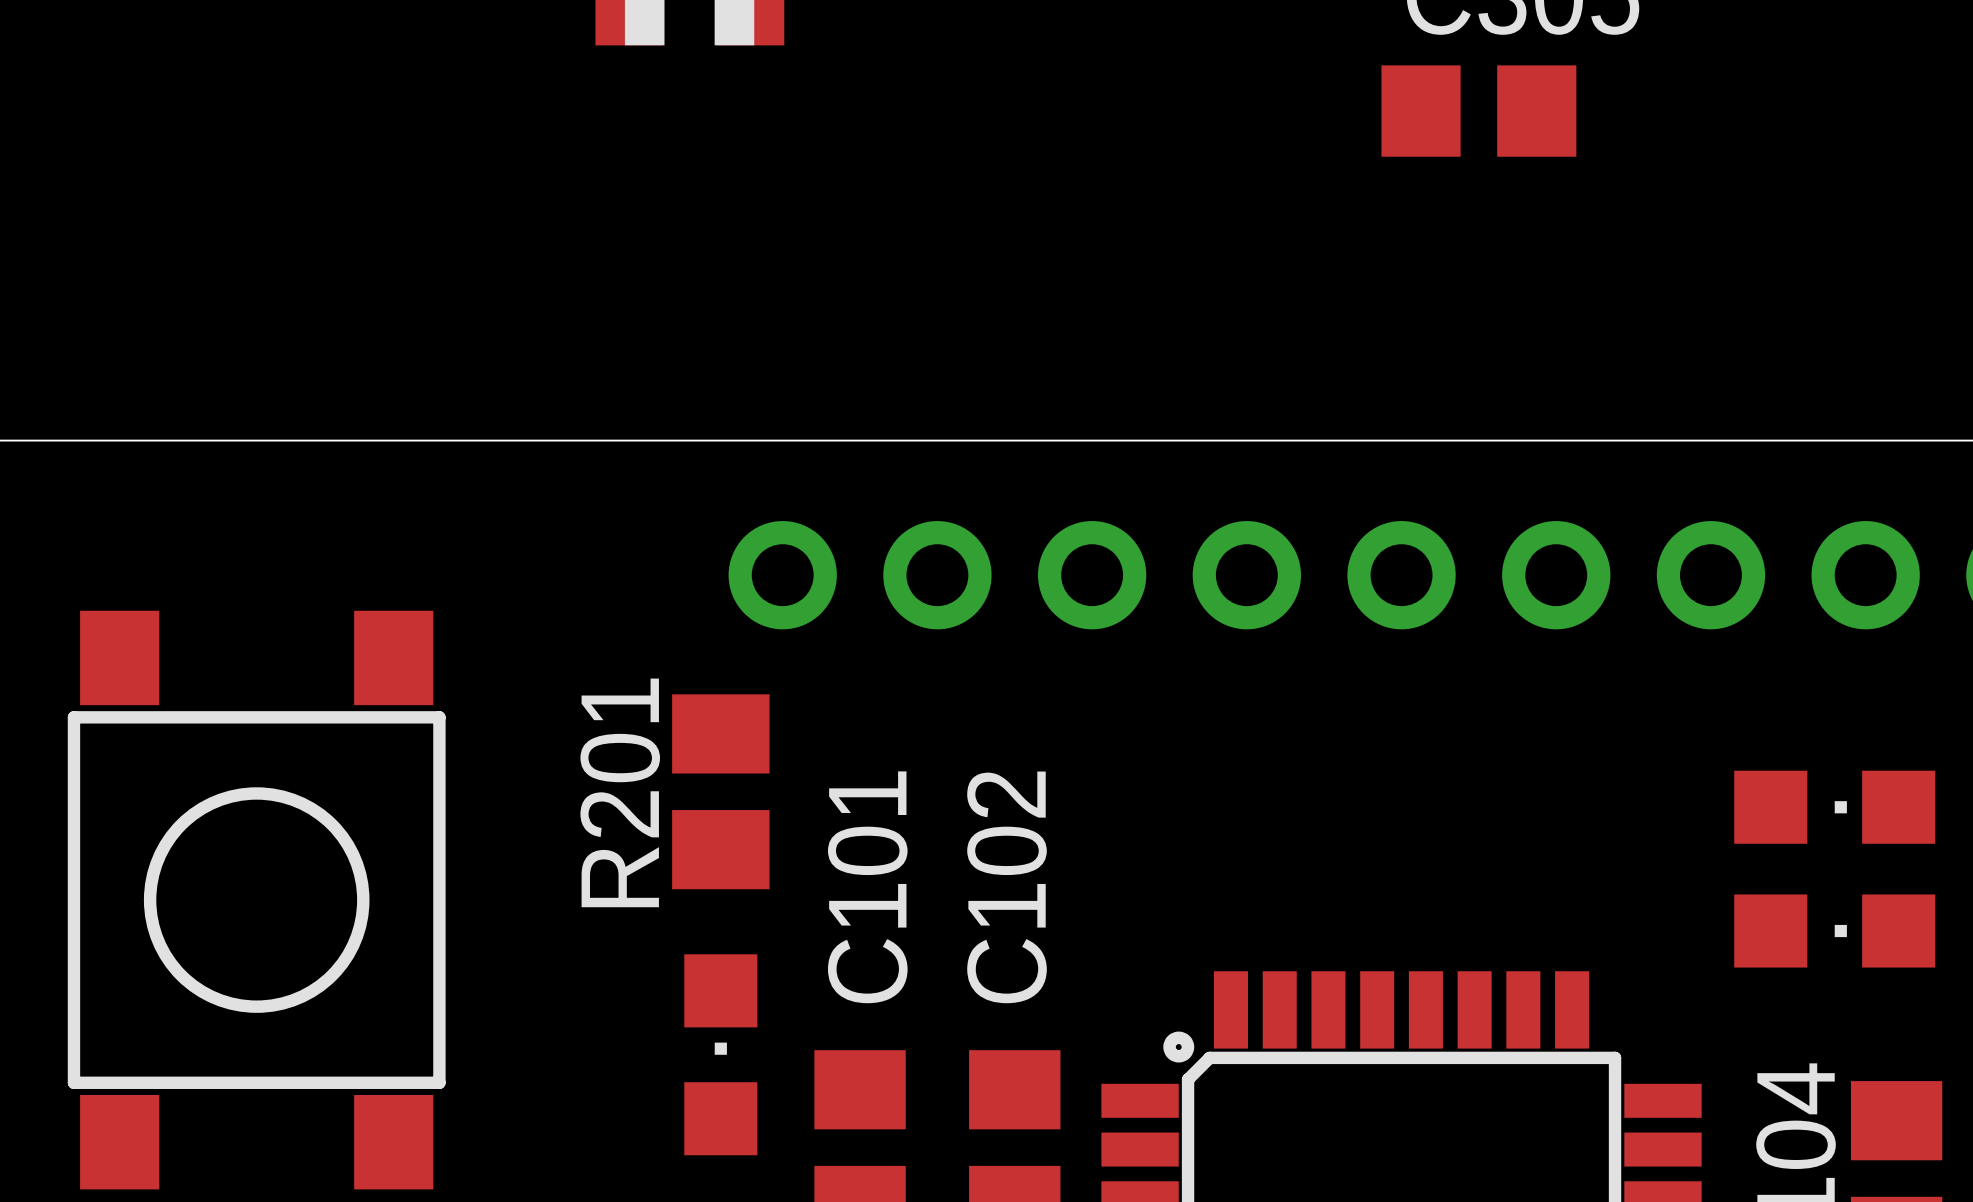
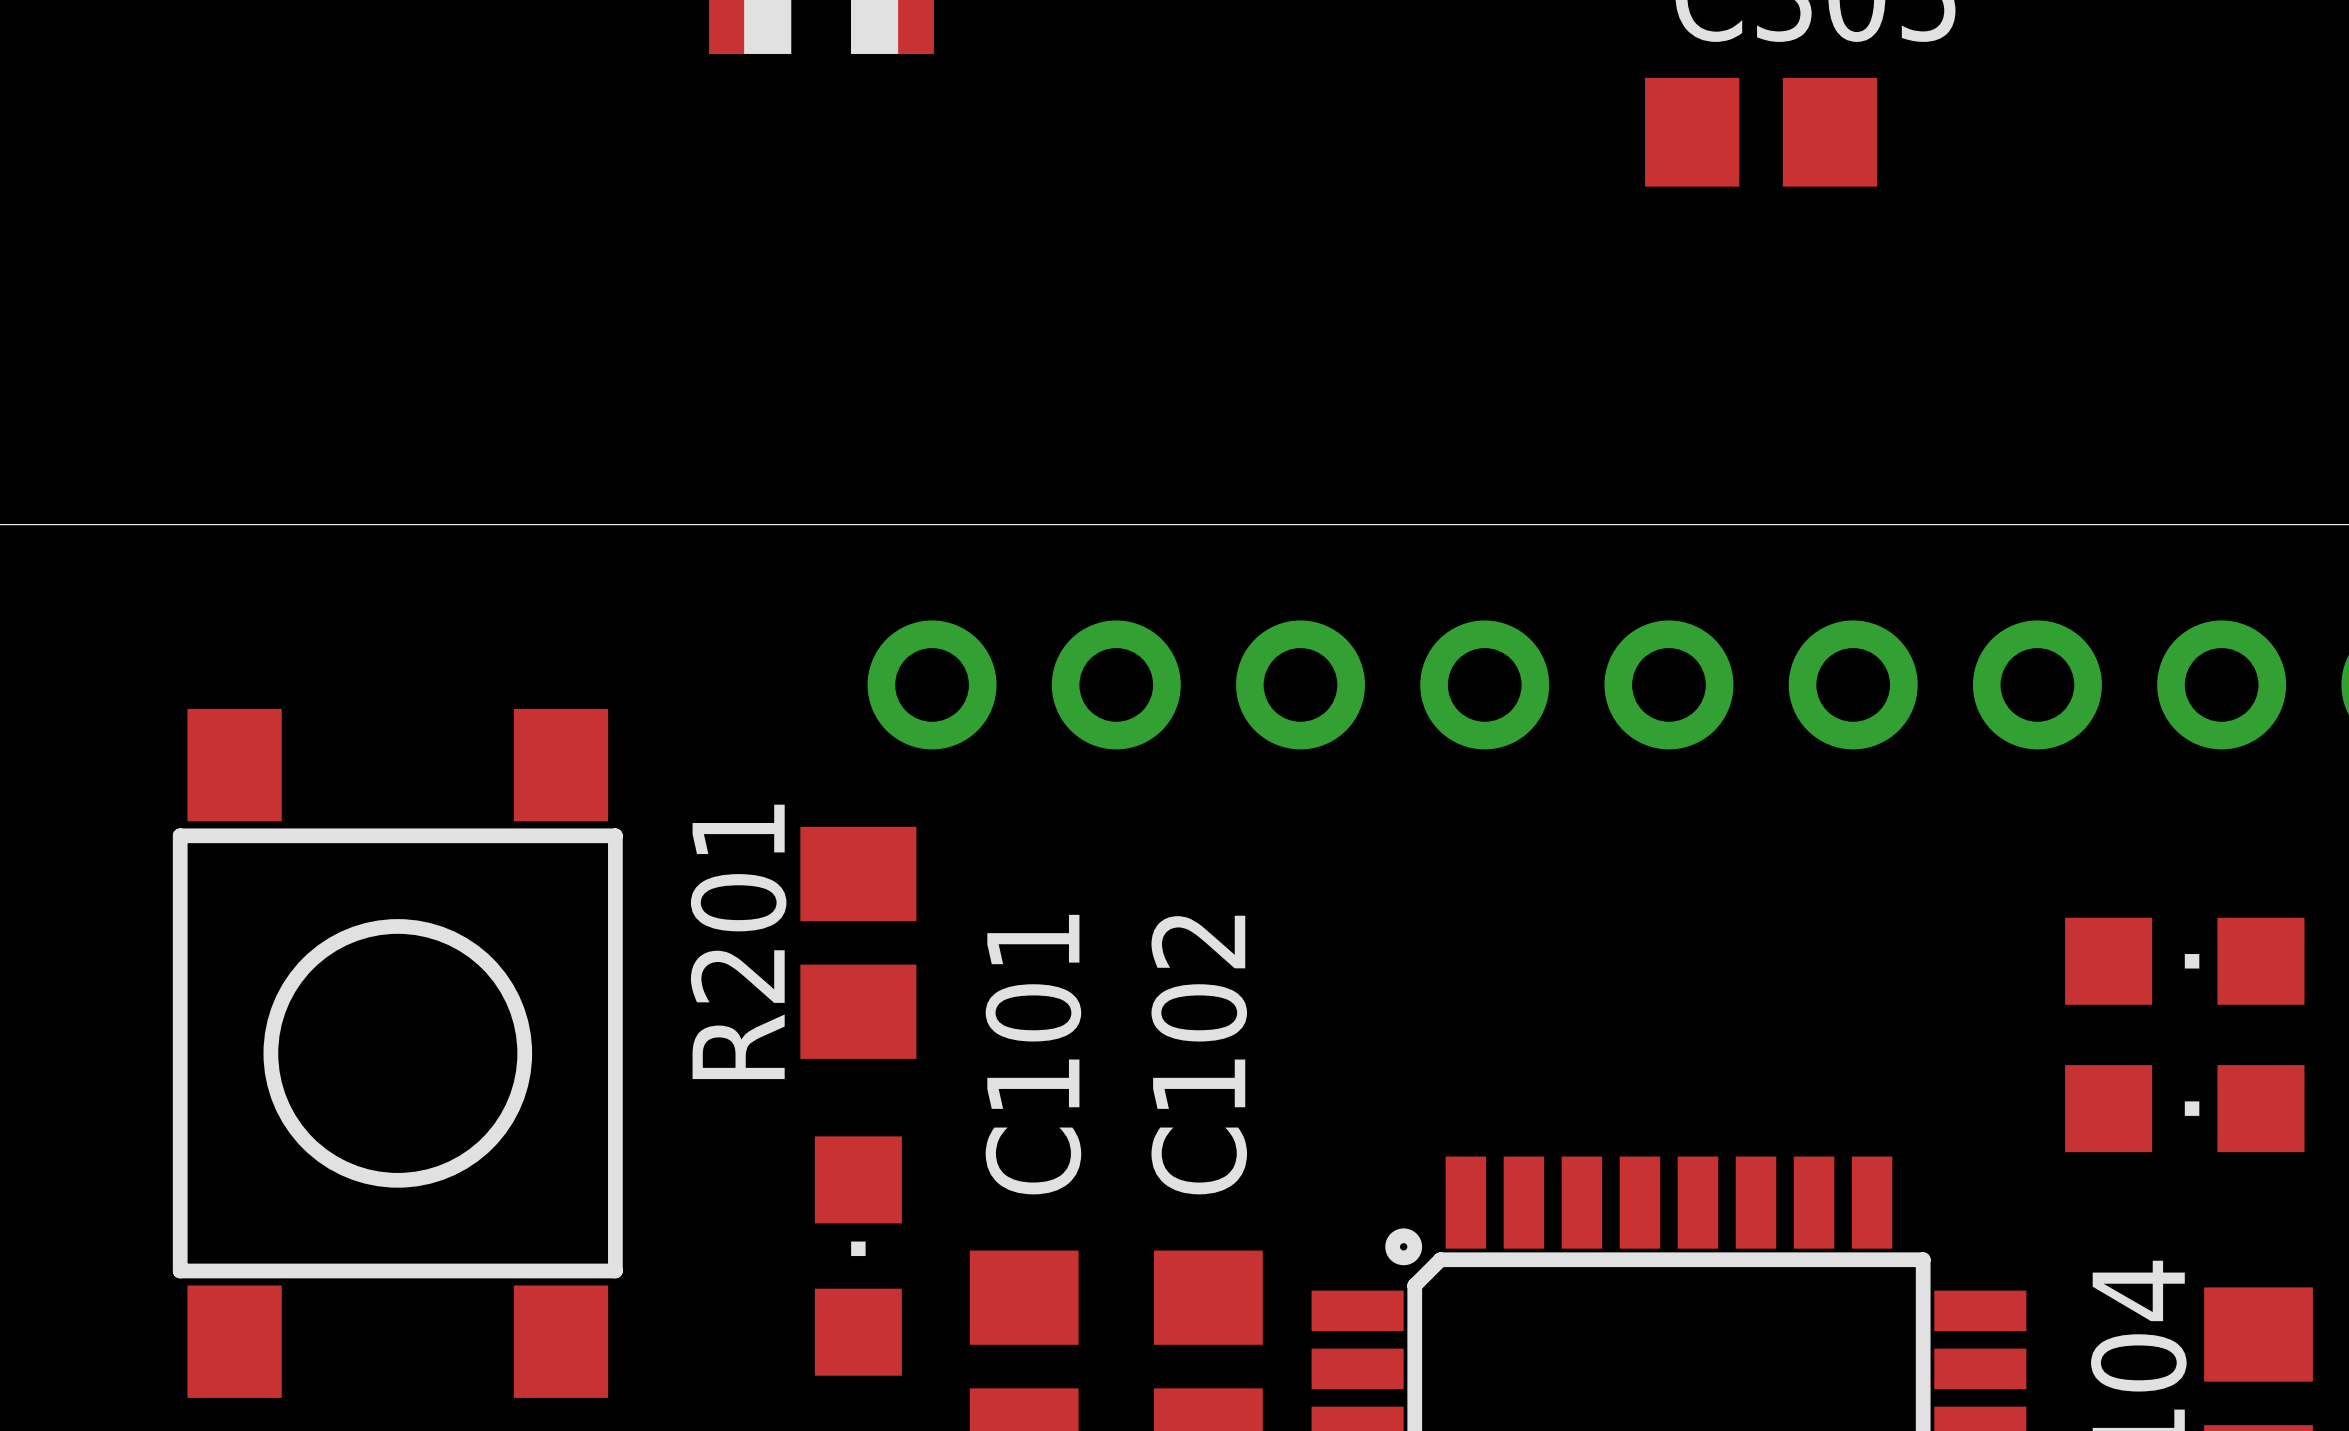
part position: (256, 900) -> (397, 1053)

